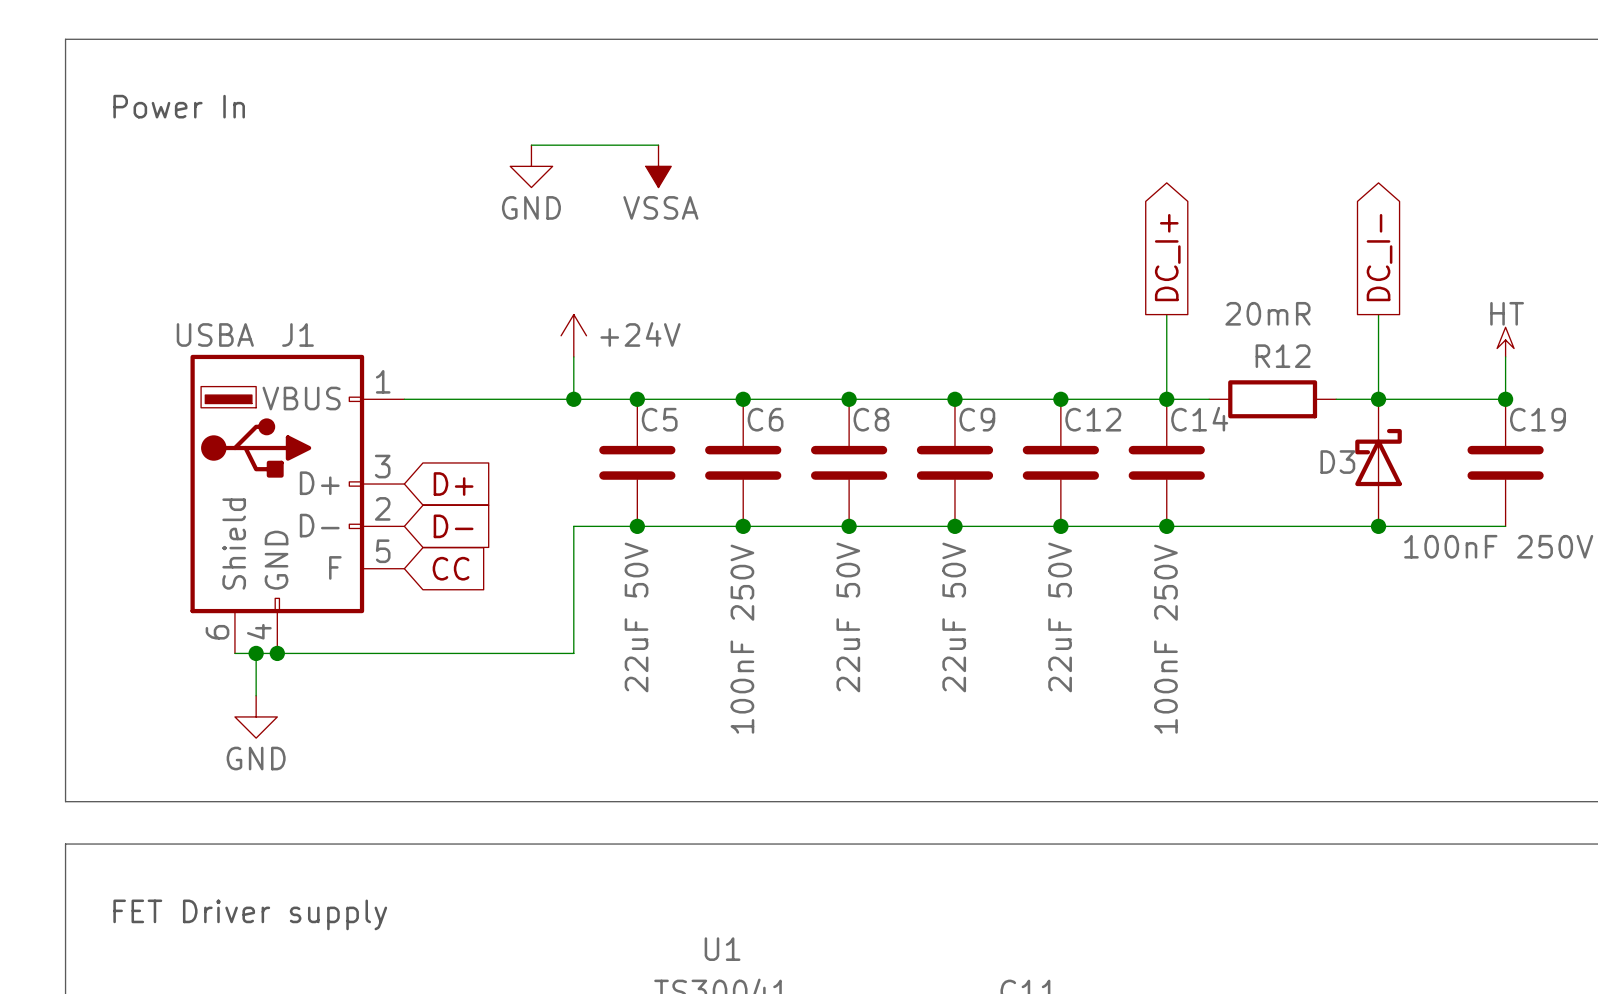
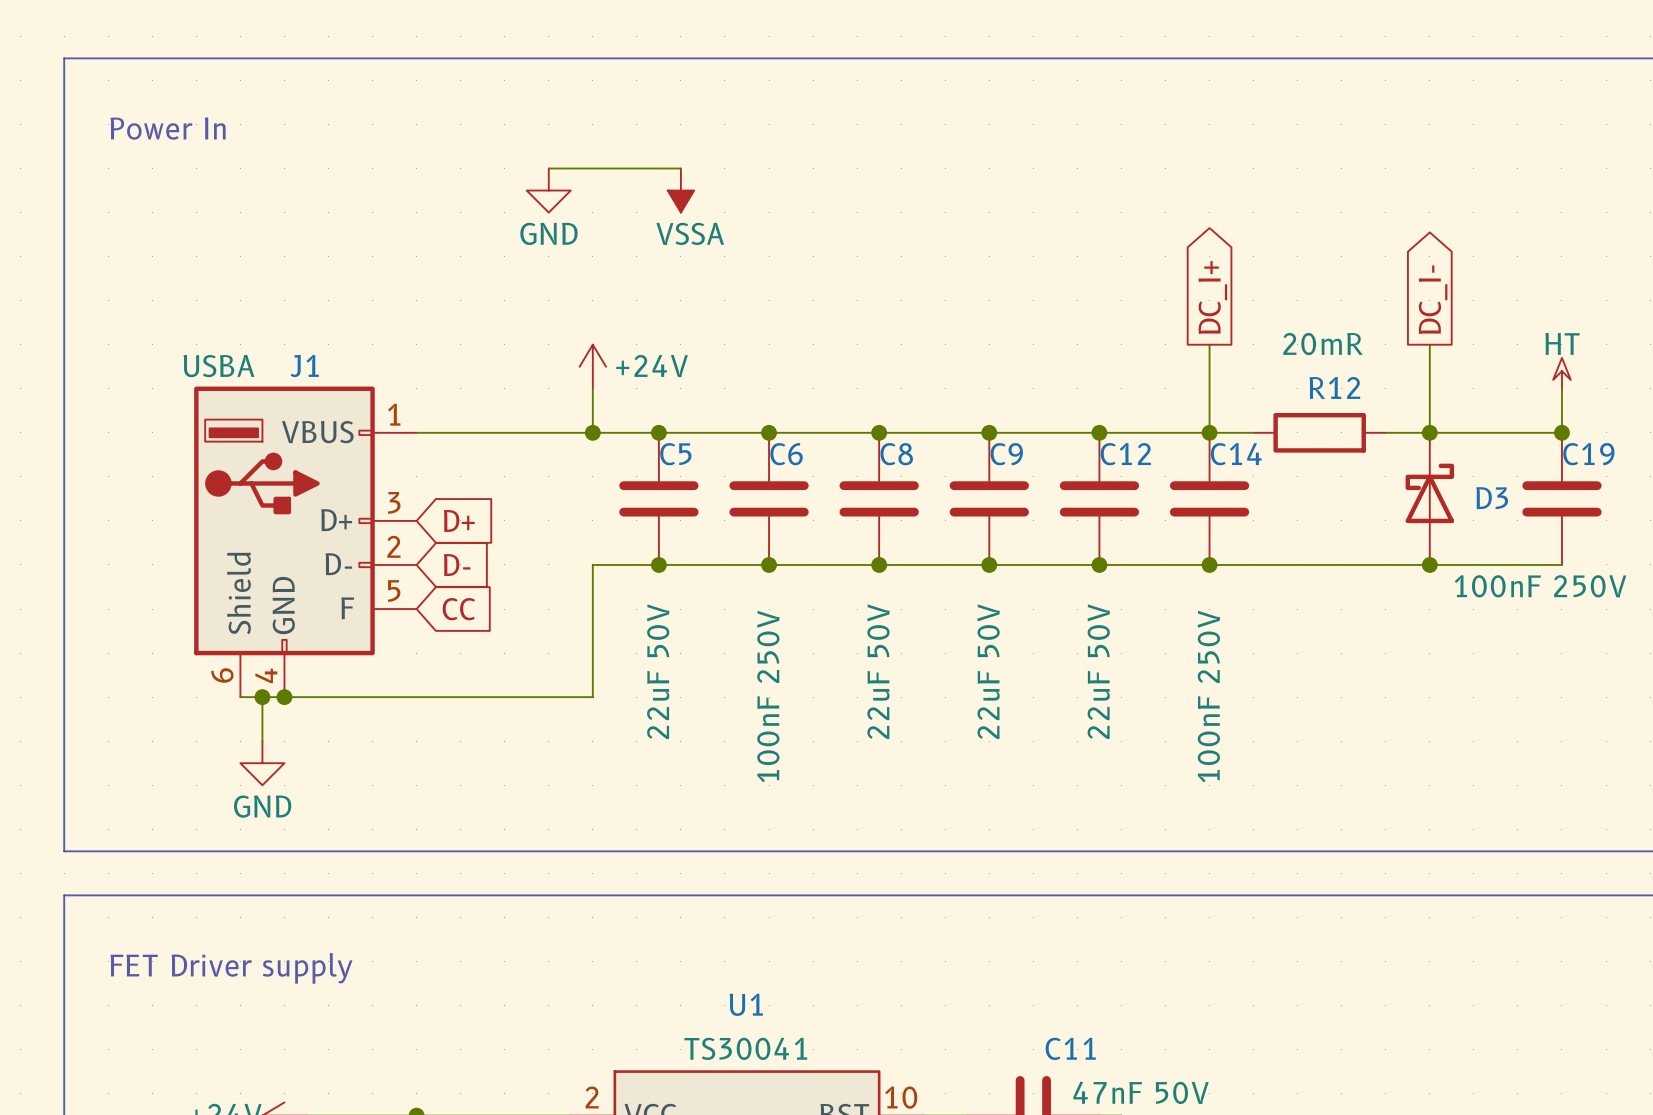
D3 name position: D3 (1337, 462) -> D3 (1492, 498)

